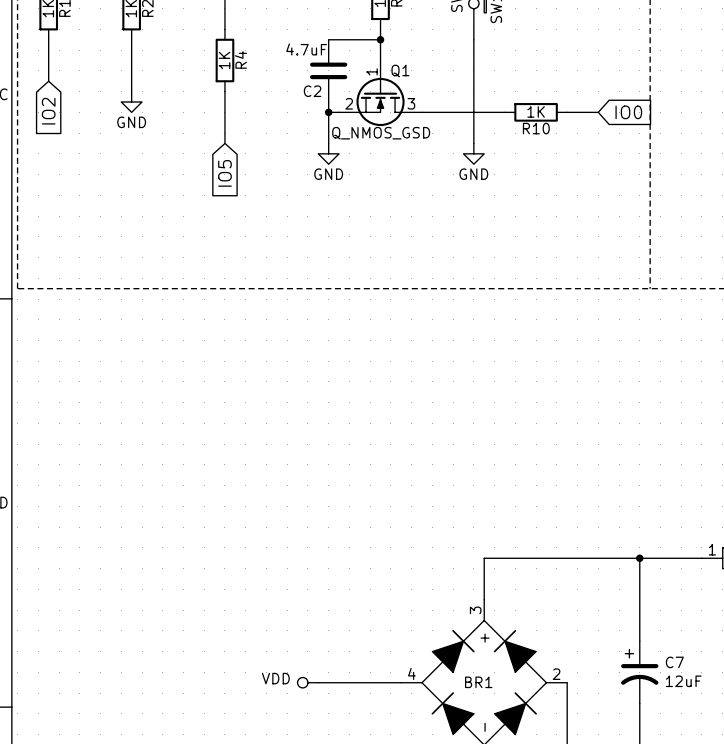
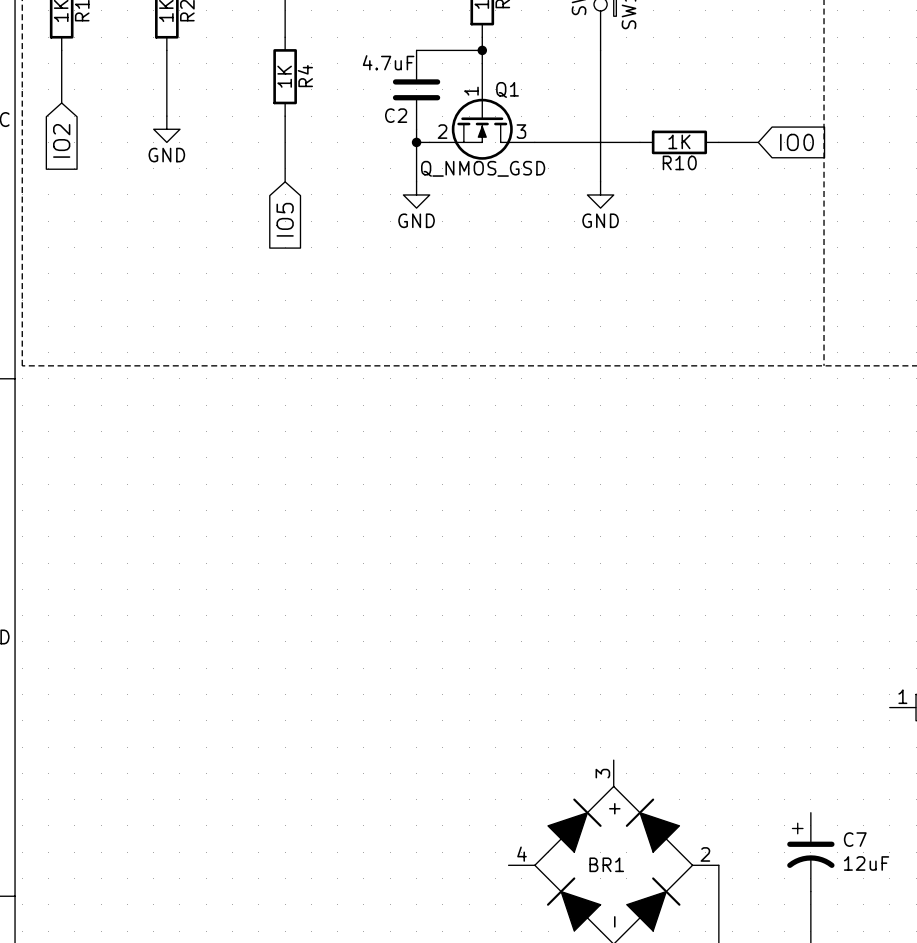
wire: (639, 558) (639, 641) -> none
junction: (639, 558) -> none
wire: (701, 558) (484, 558) (484, 599) -> none
power symbol: VDD (307, 682) -> none
wire: (318, 682) (401, 682) -> none

